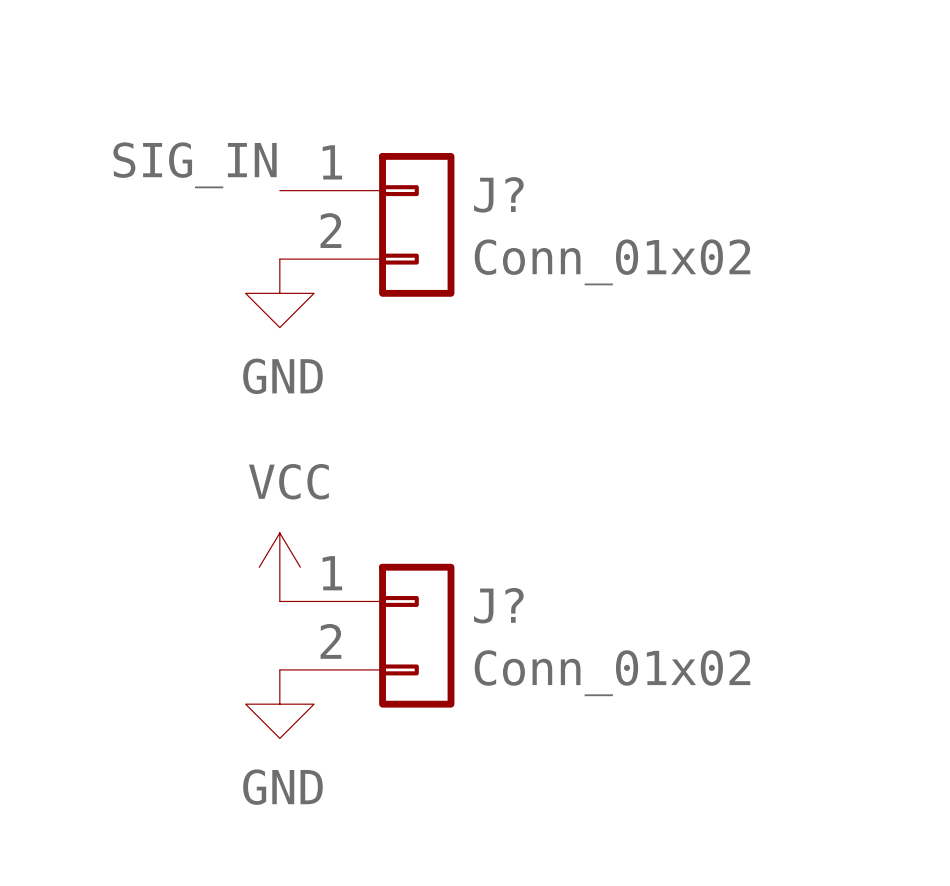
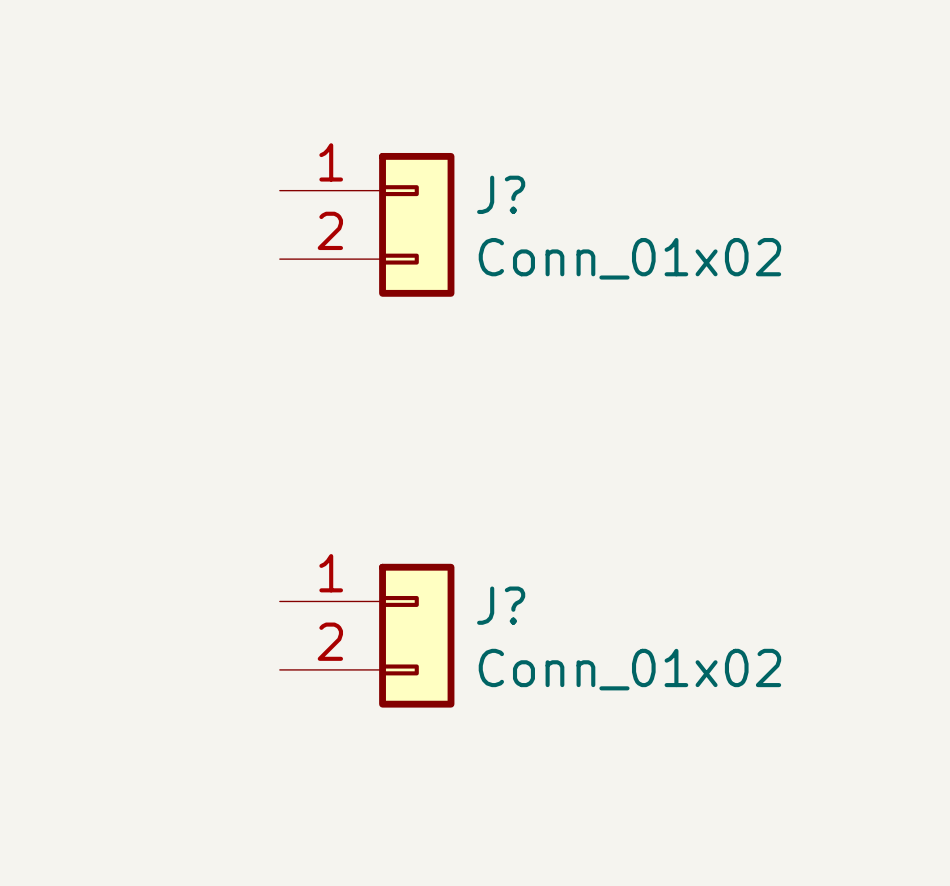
label: SIG_IN (195, 165) -> none
power symbol: GND (279, 293) -> none
power symbol: VCC (279, 567) -> none
power symbol: GND (279, 704) -> none

